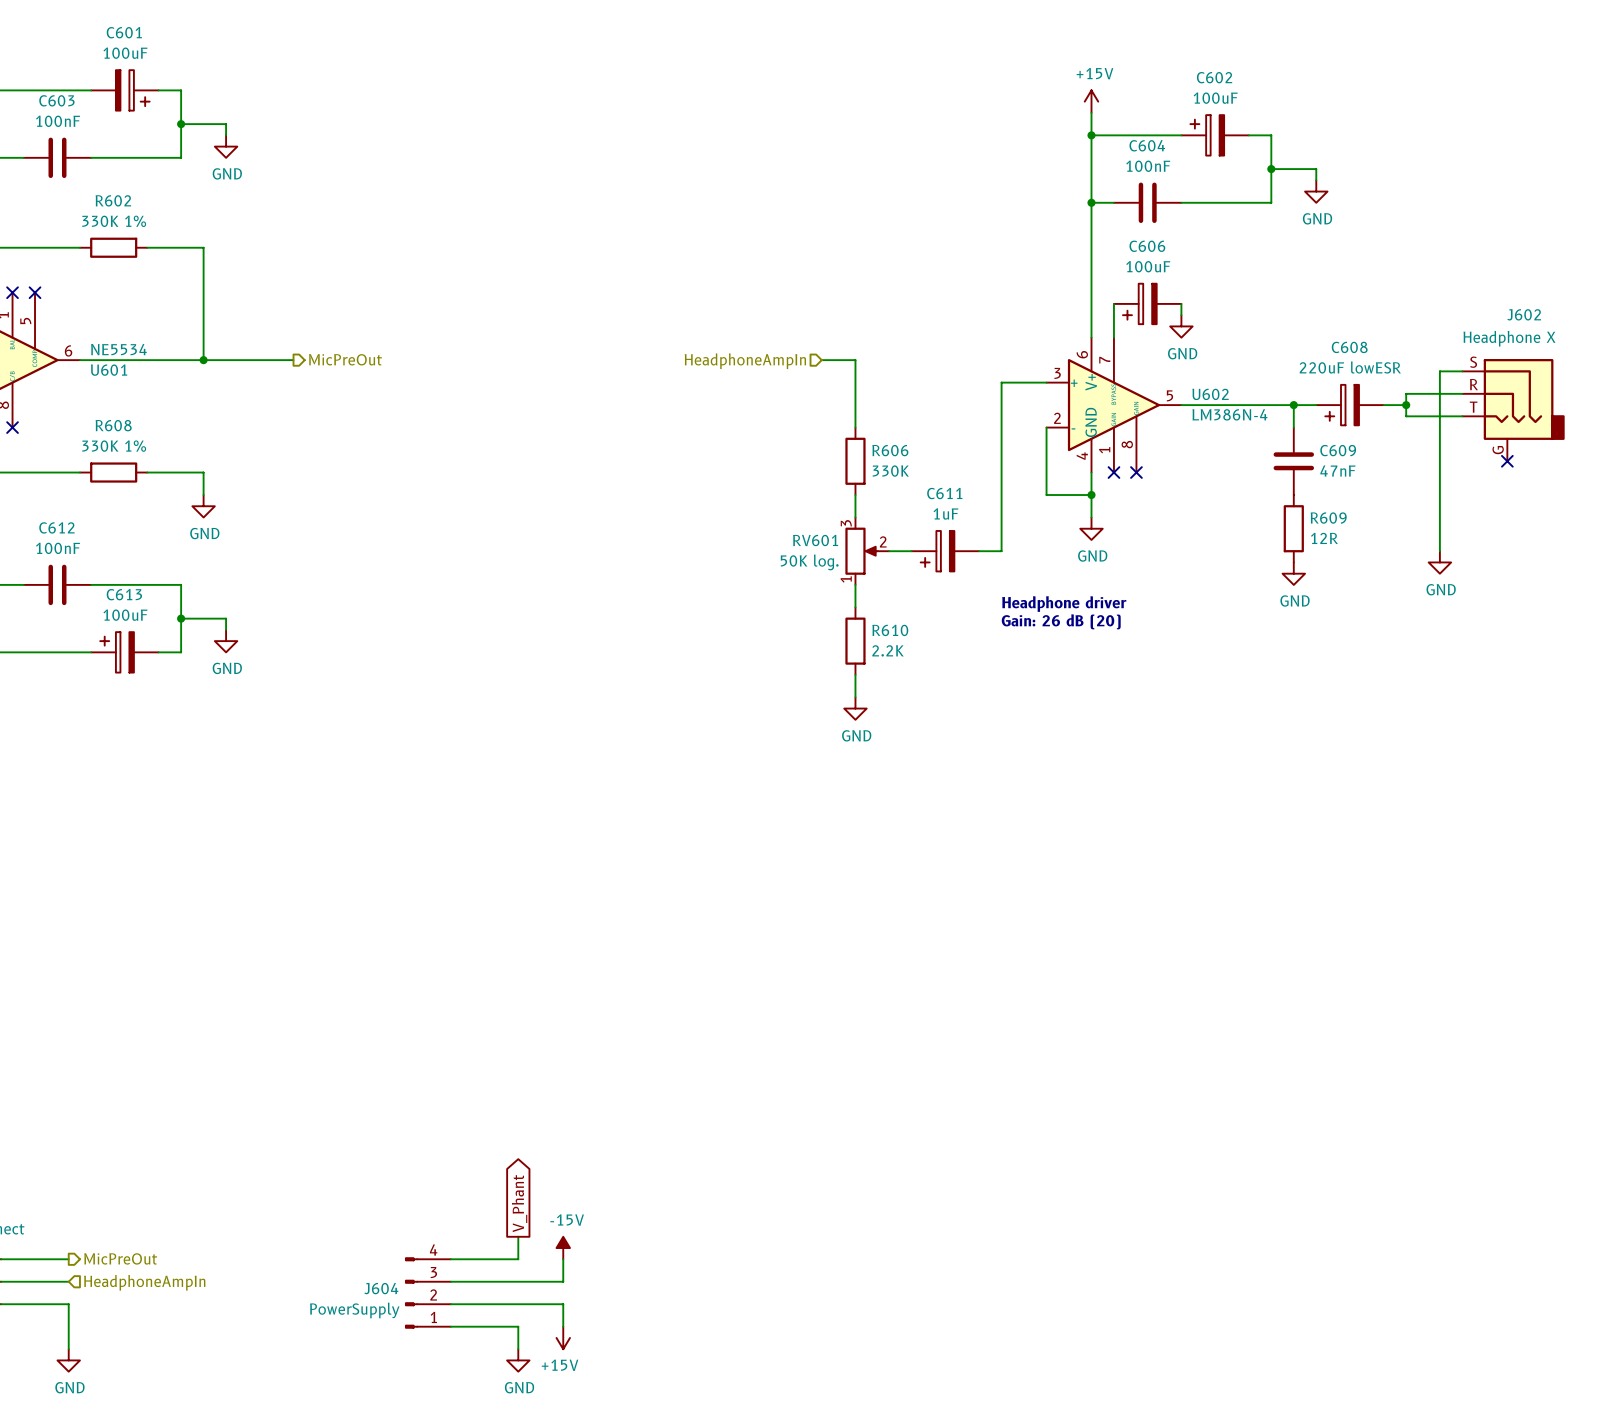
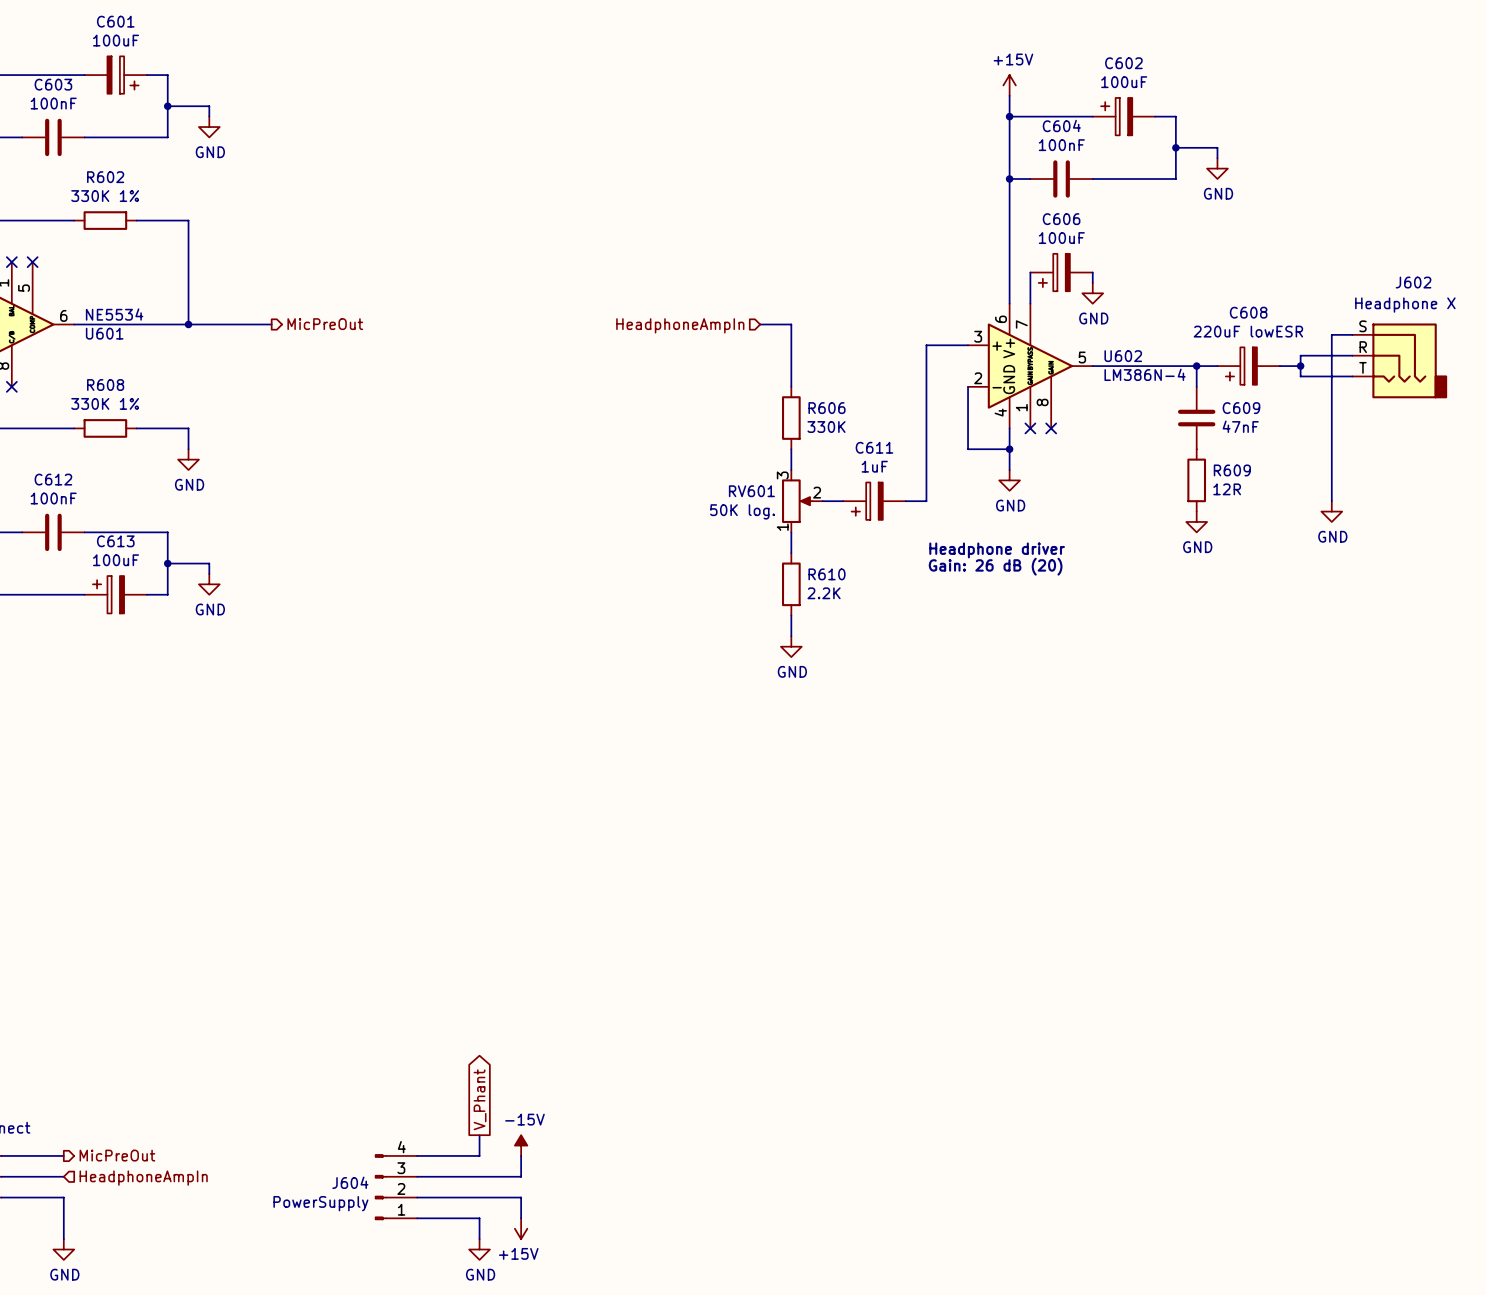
J602 symbol: [1462, 359, 1565, 462] -> [1352, 323, 1448, 399]
no-connect mark: (1507, 461) -> none

